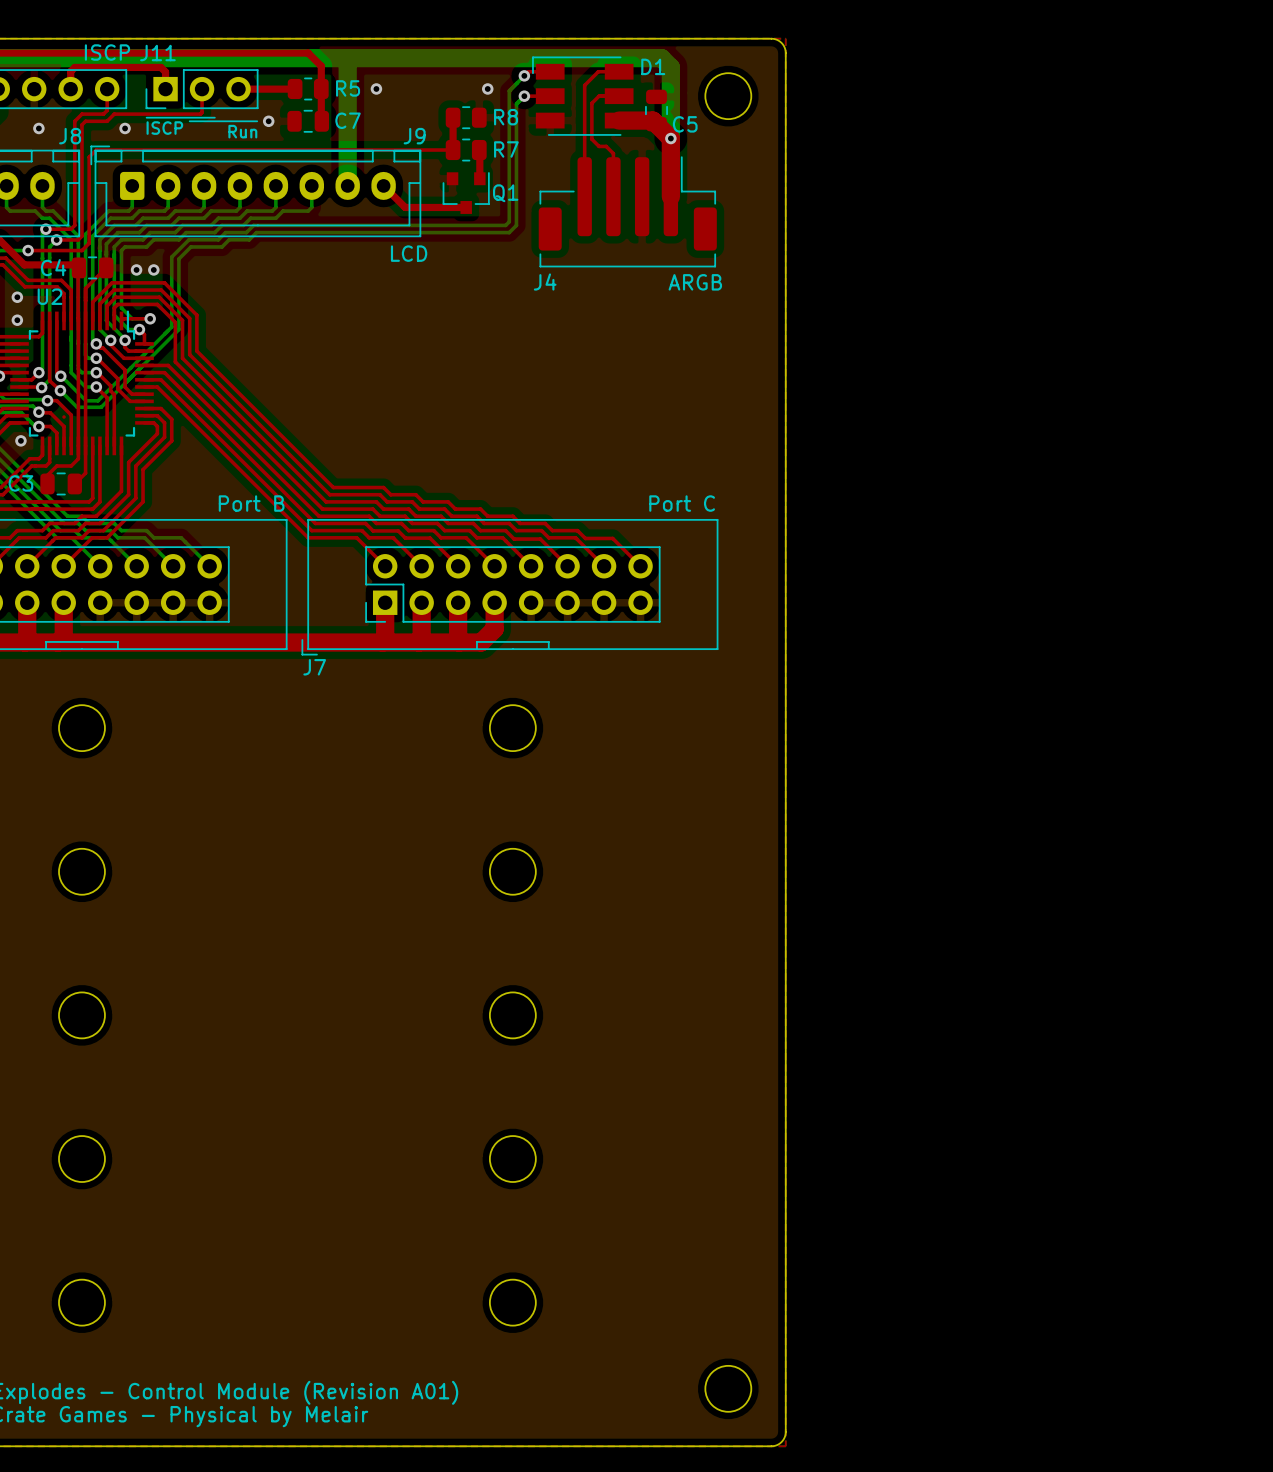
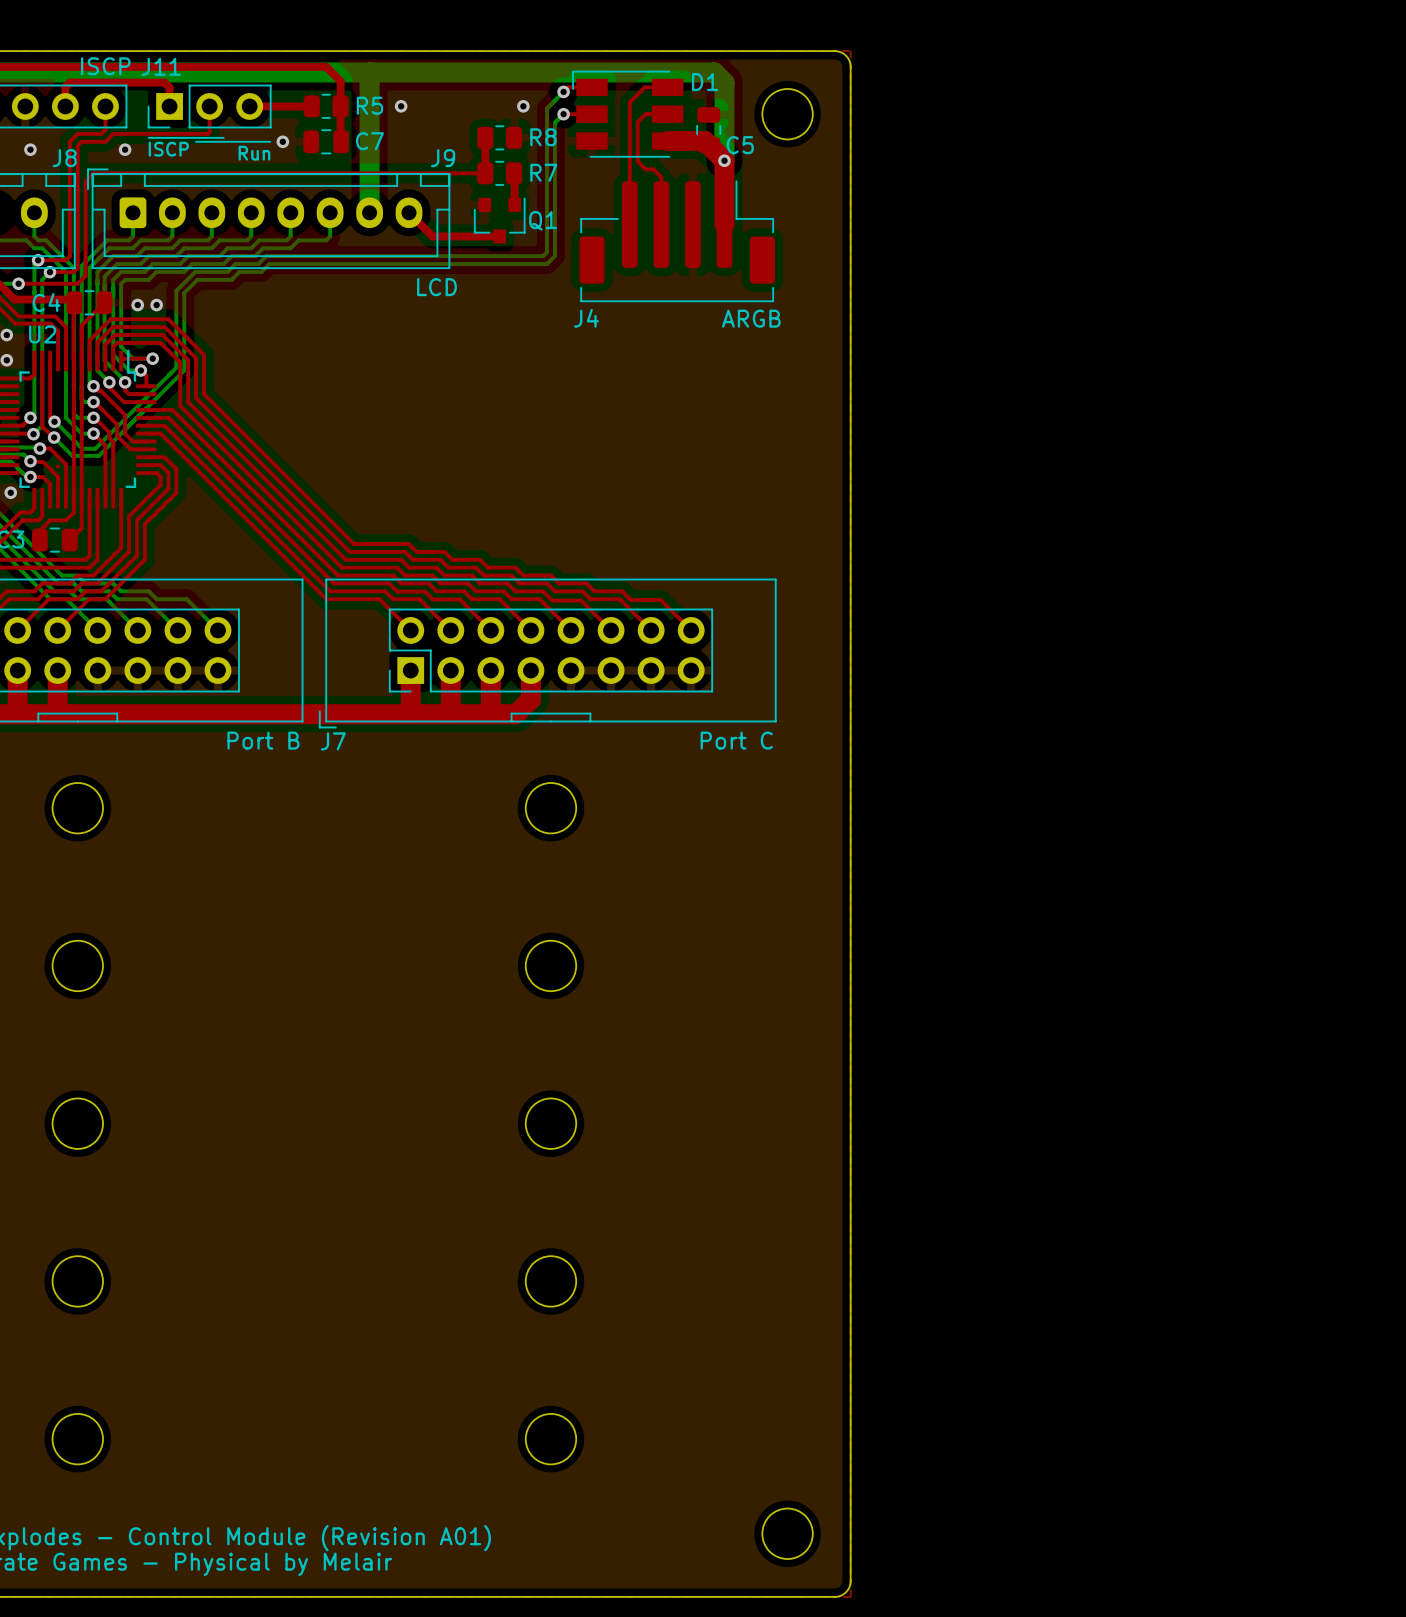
text position: Port B (251, 503) -> Port B (263, 740)
text position: Port C (682, 503) -> Port C (736, 740)

